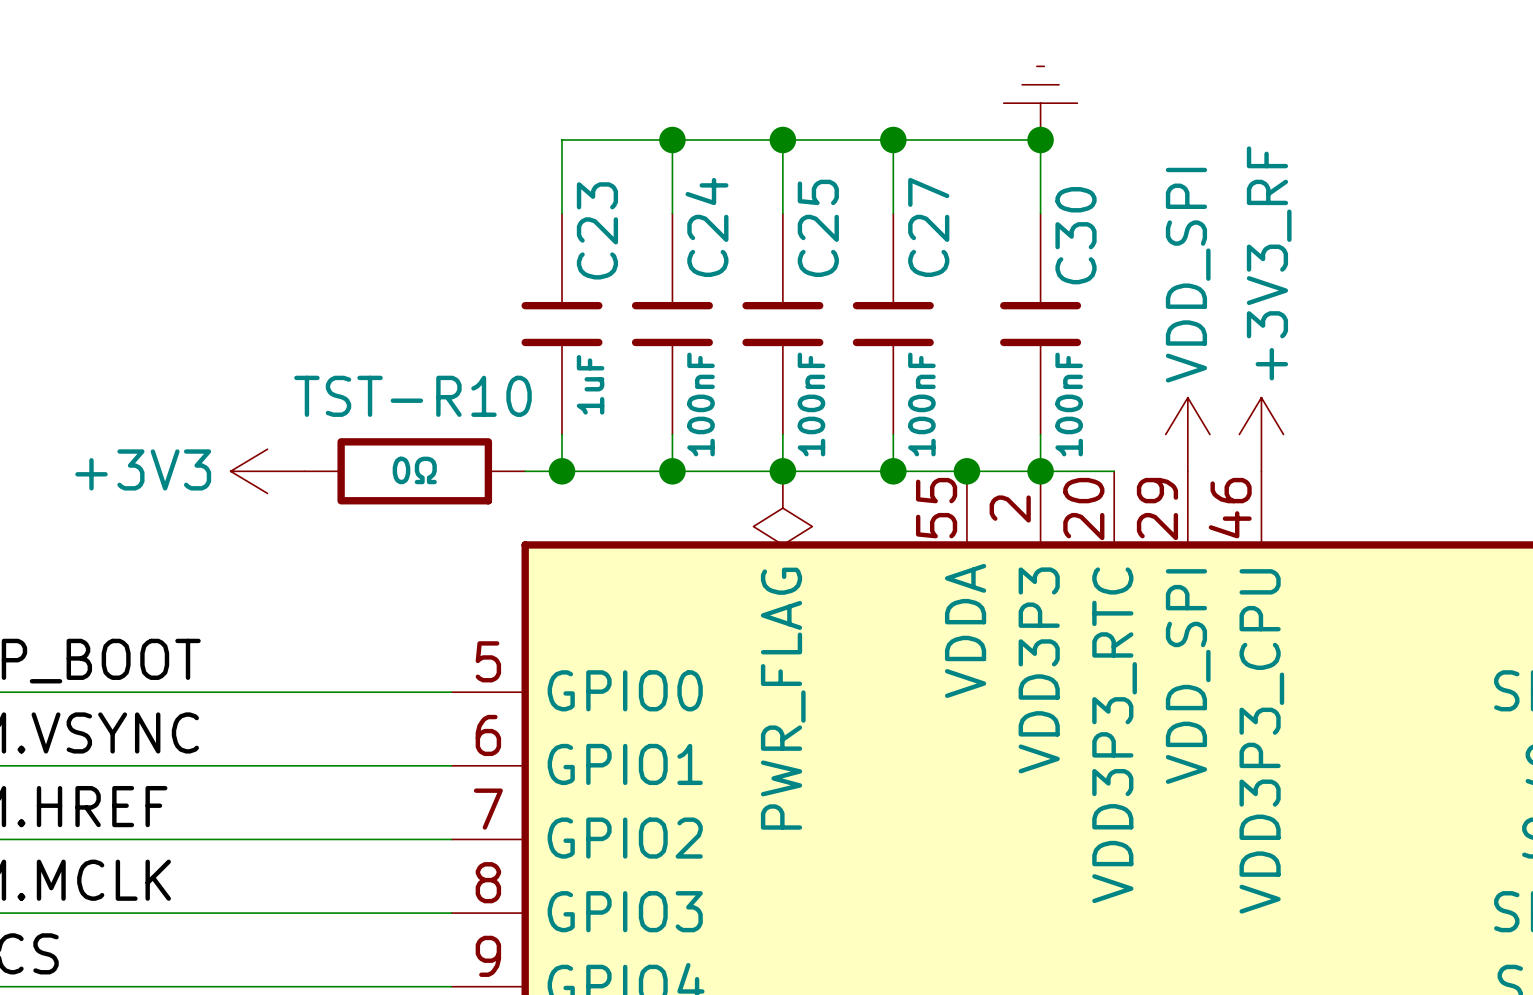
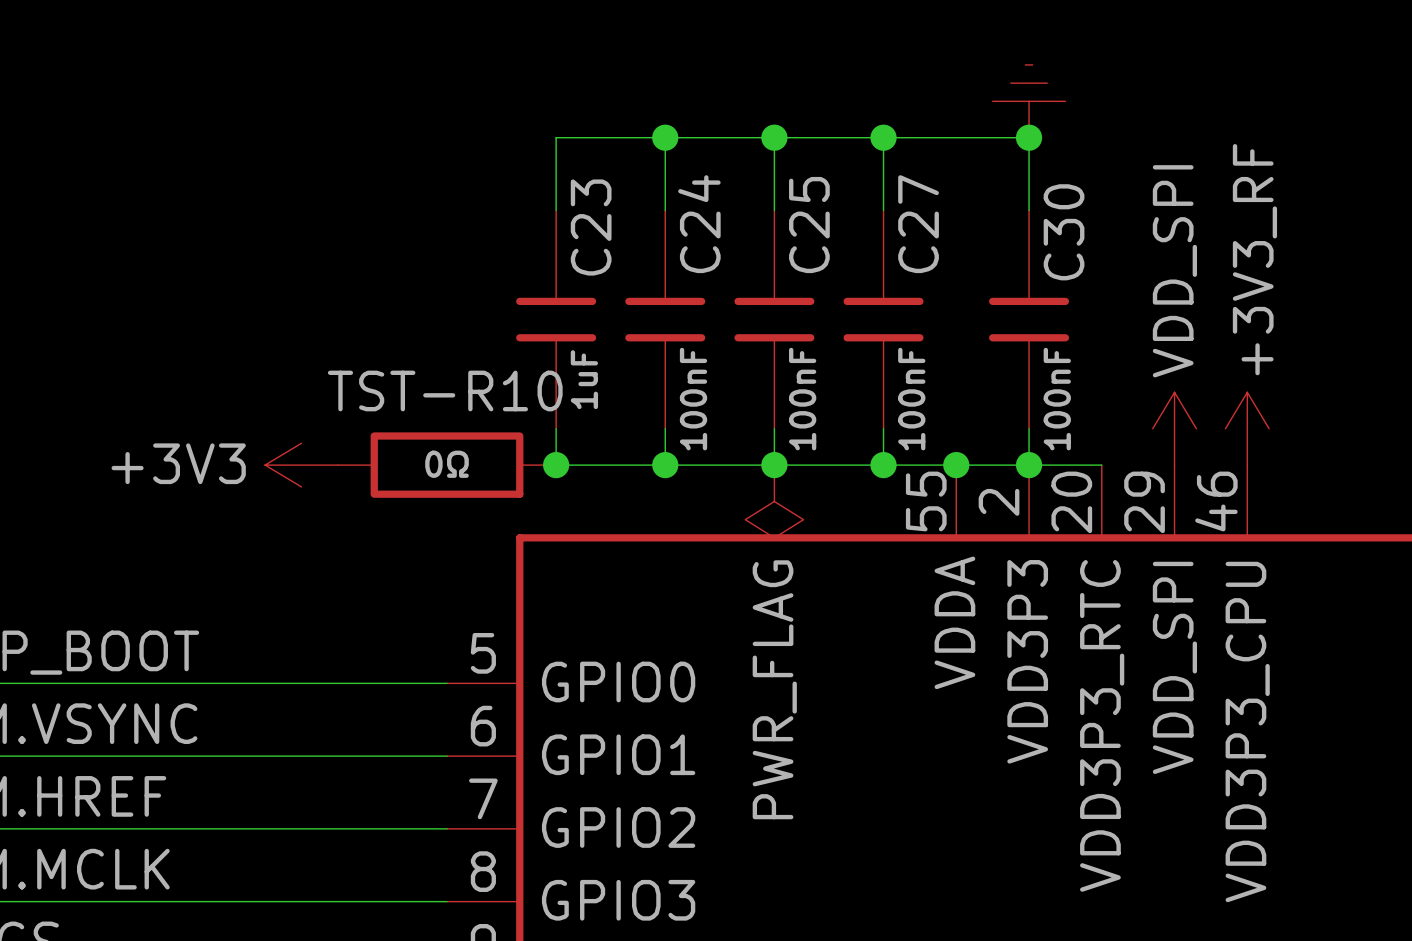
power symbol position: +3V3 (267, 471) -> +3V3 (301, 465)
TST-R10 position: (414, 471) -> (447, 465)

